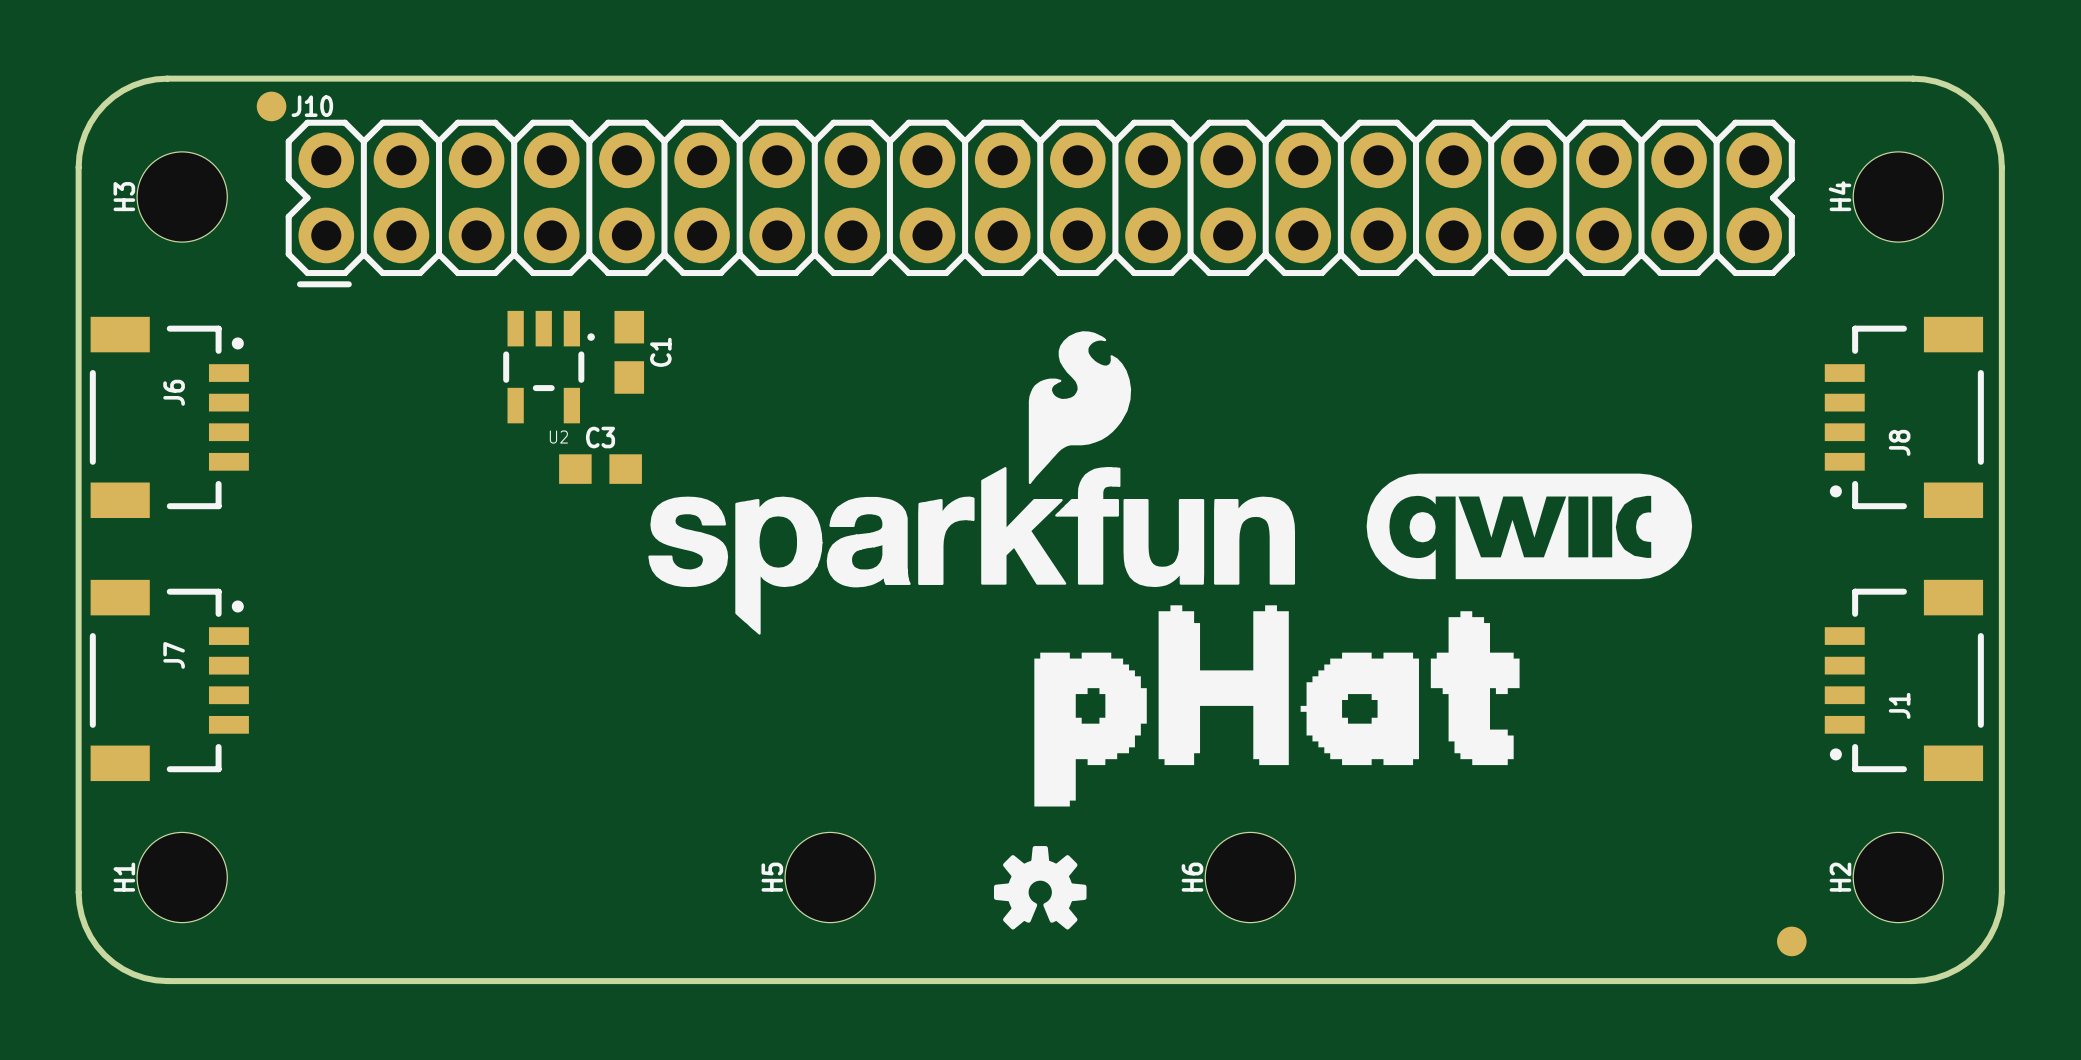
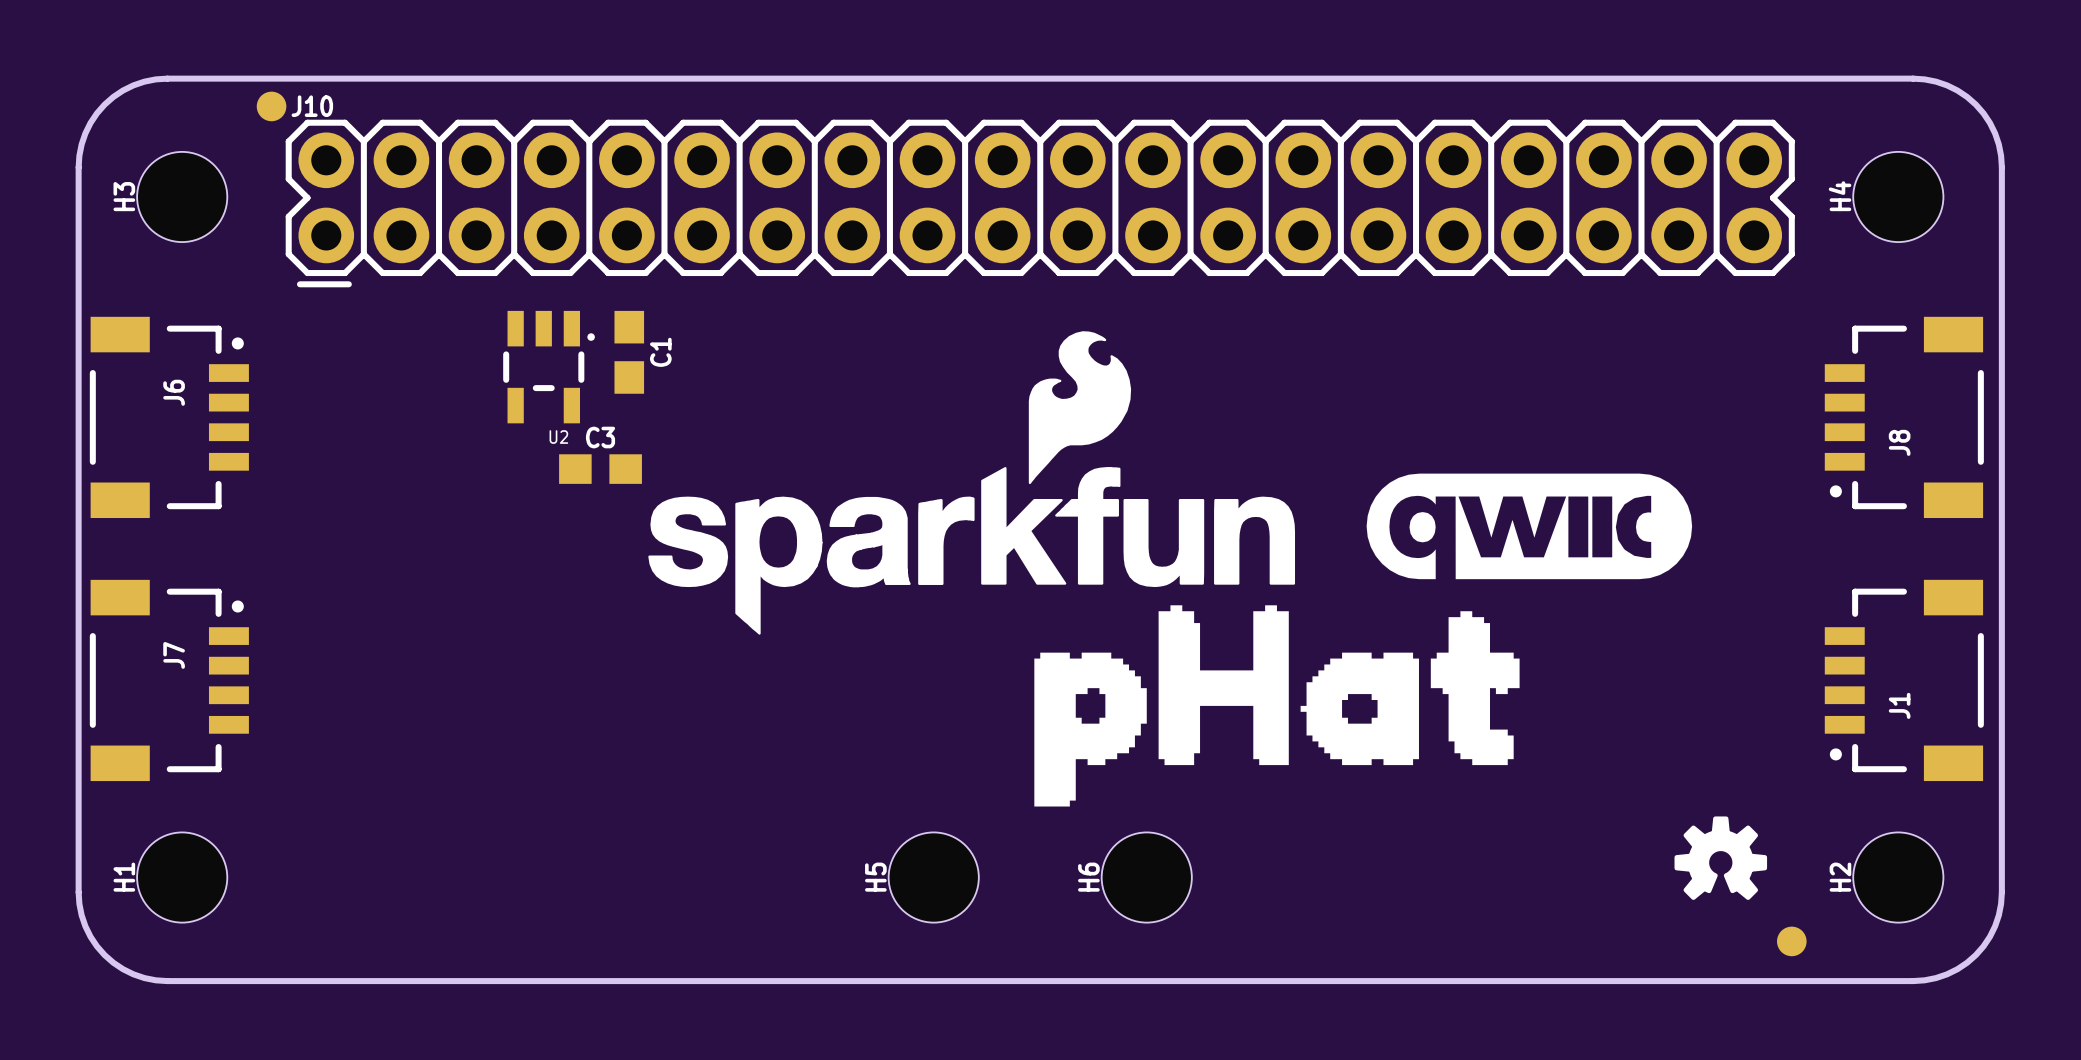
H5 position: (830, 877) -> (933, 877)
H6 position: (1250, 877) -> (1146, 877)
drawing position: (1040, 887) -> (1720, 858)

